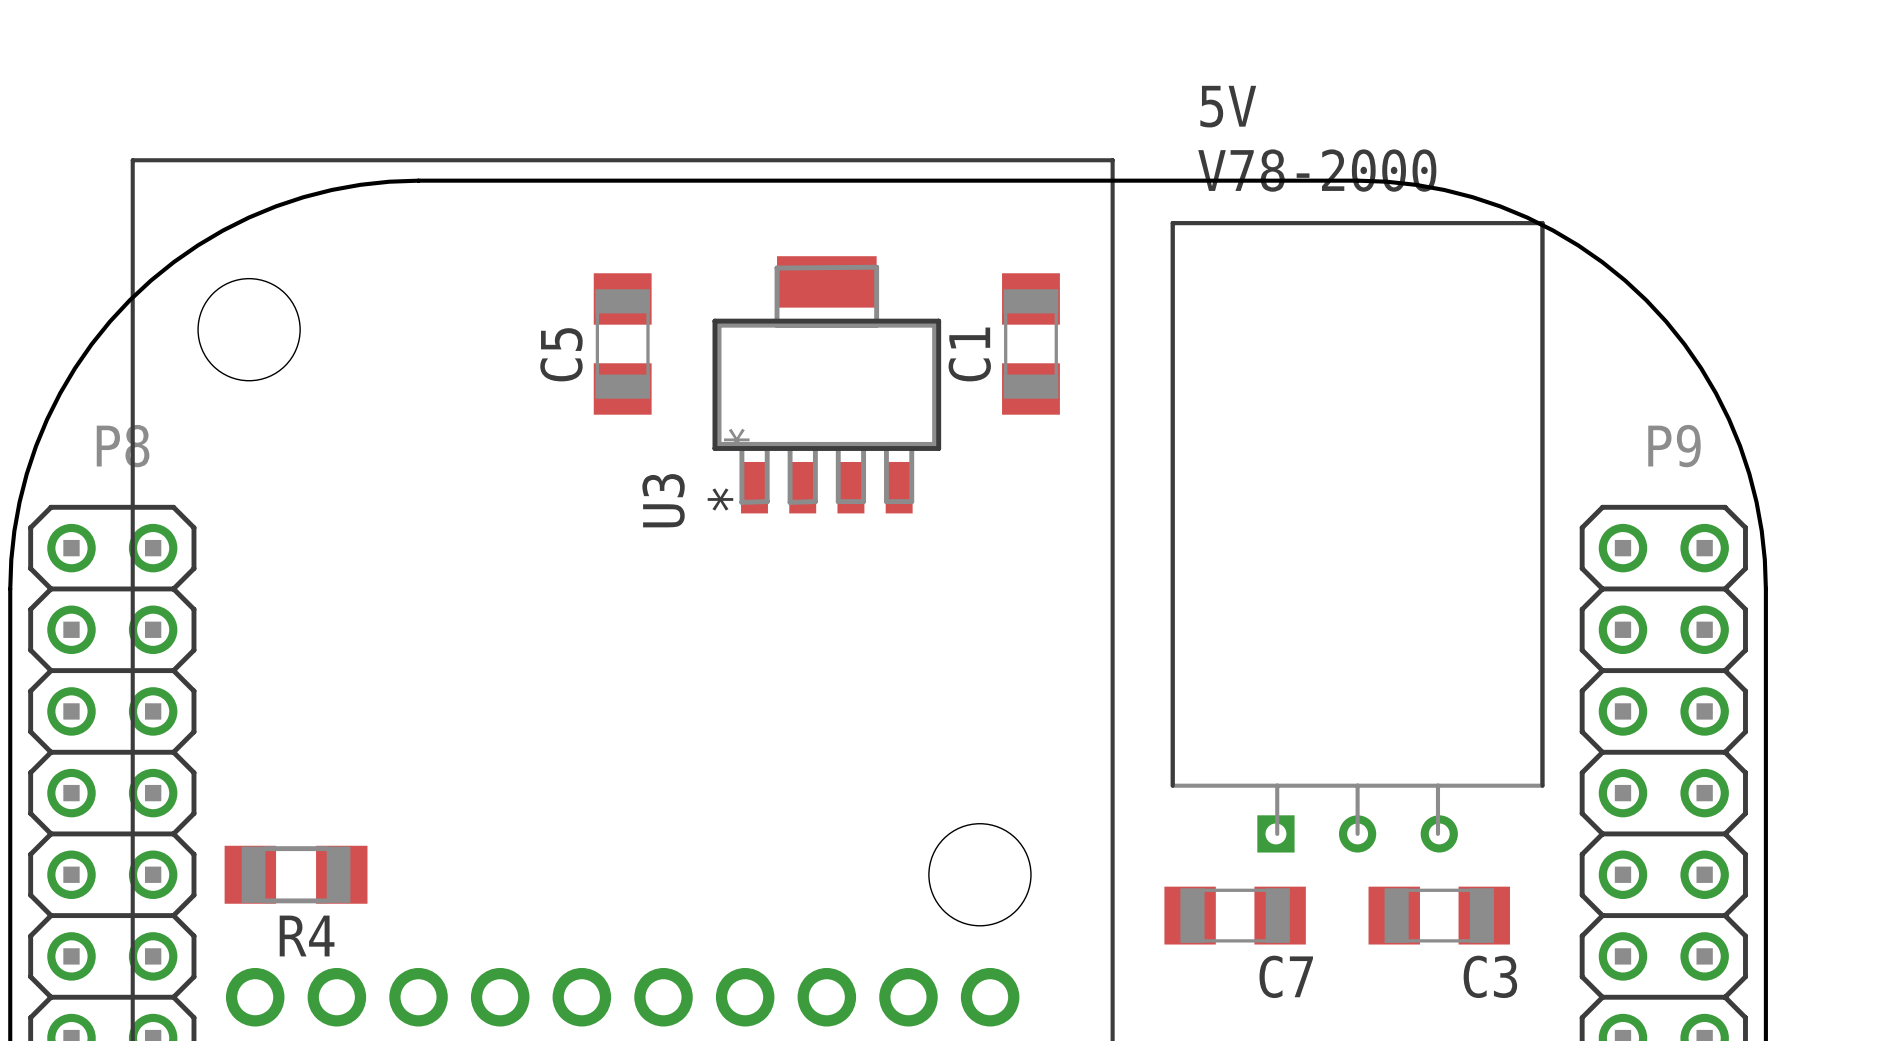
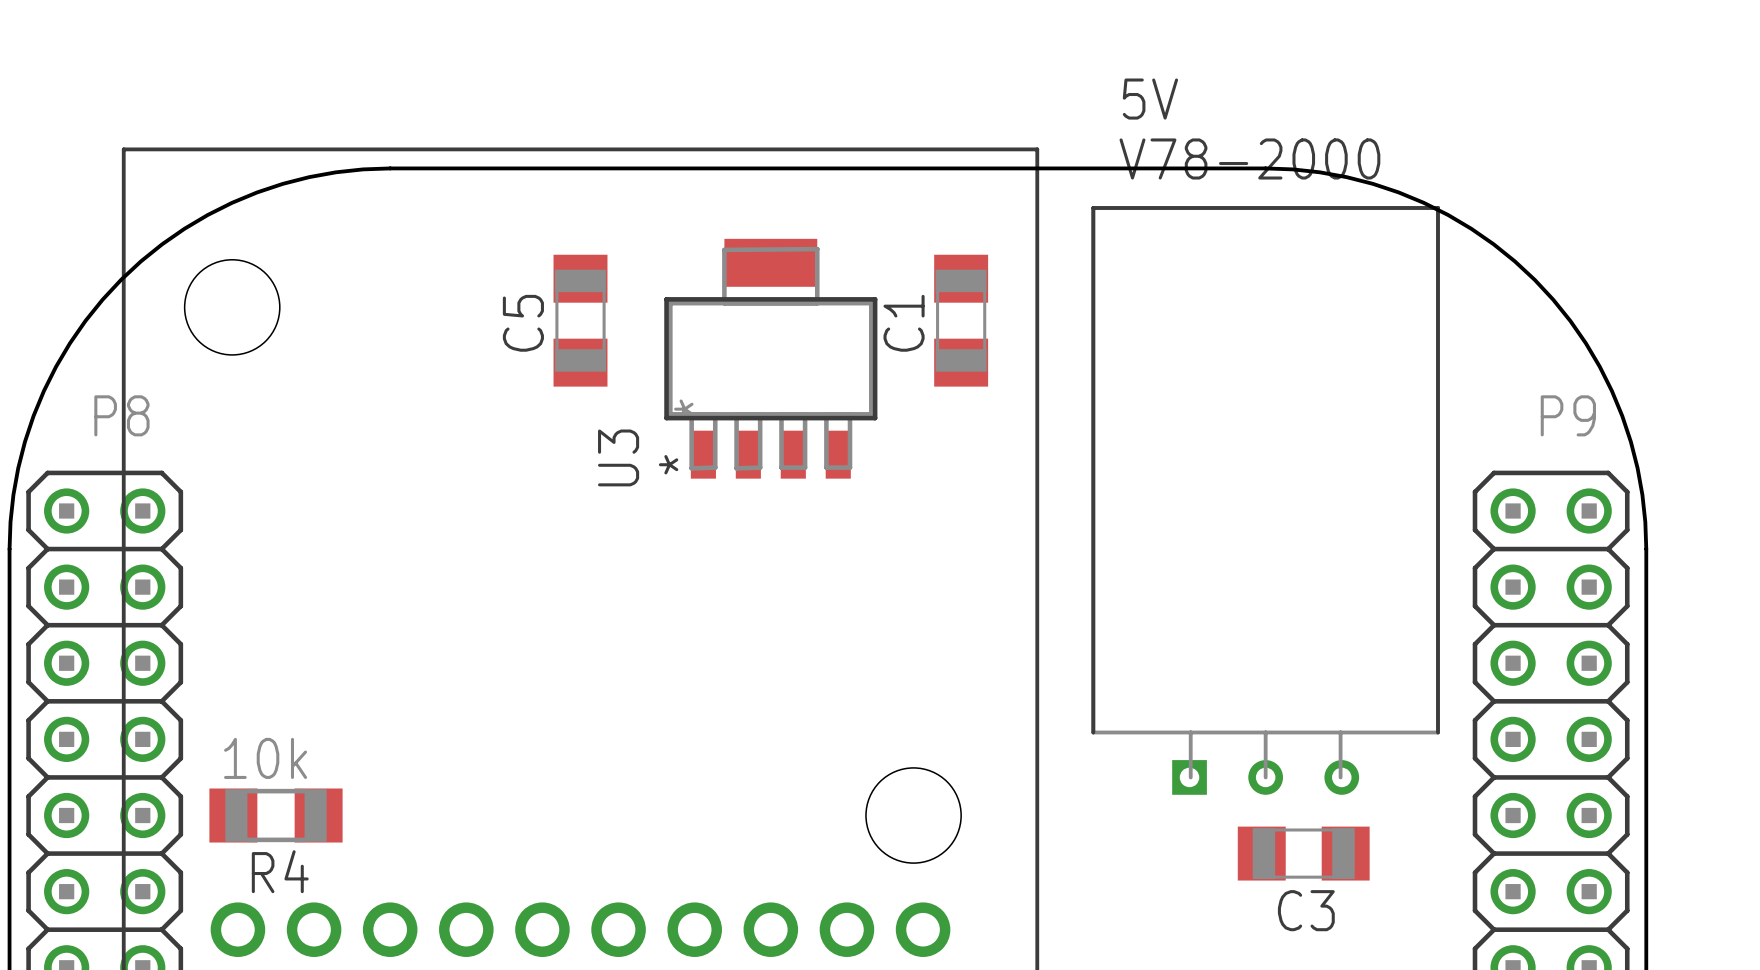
R4 value: none -> 10k (265, 758)
C7: (1235, 915) -> none
C3 position: (1439, 915) -> (1303, 853)
C3 name position: C3 (1490, 976) -> C3 (1306, 910)

